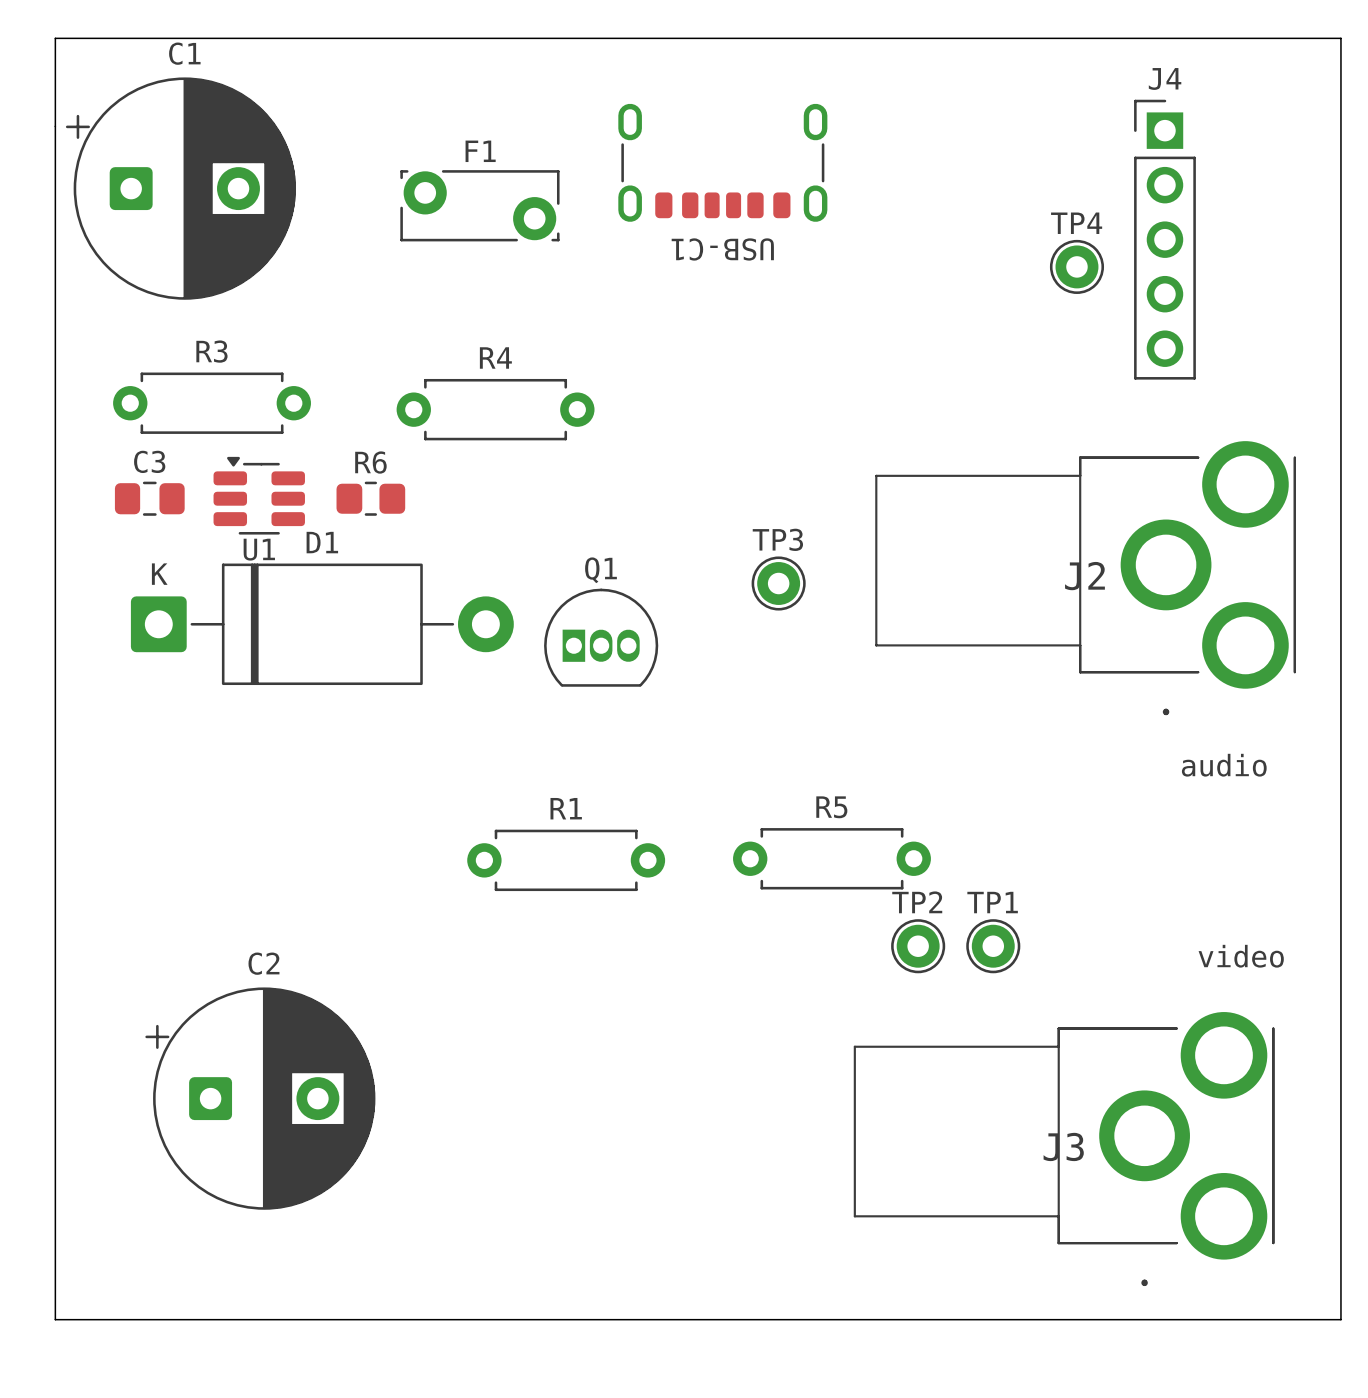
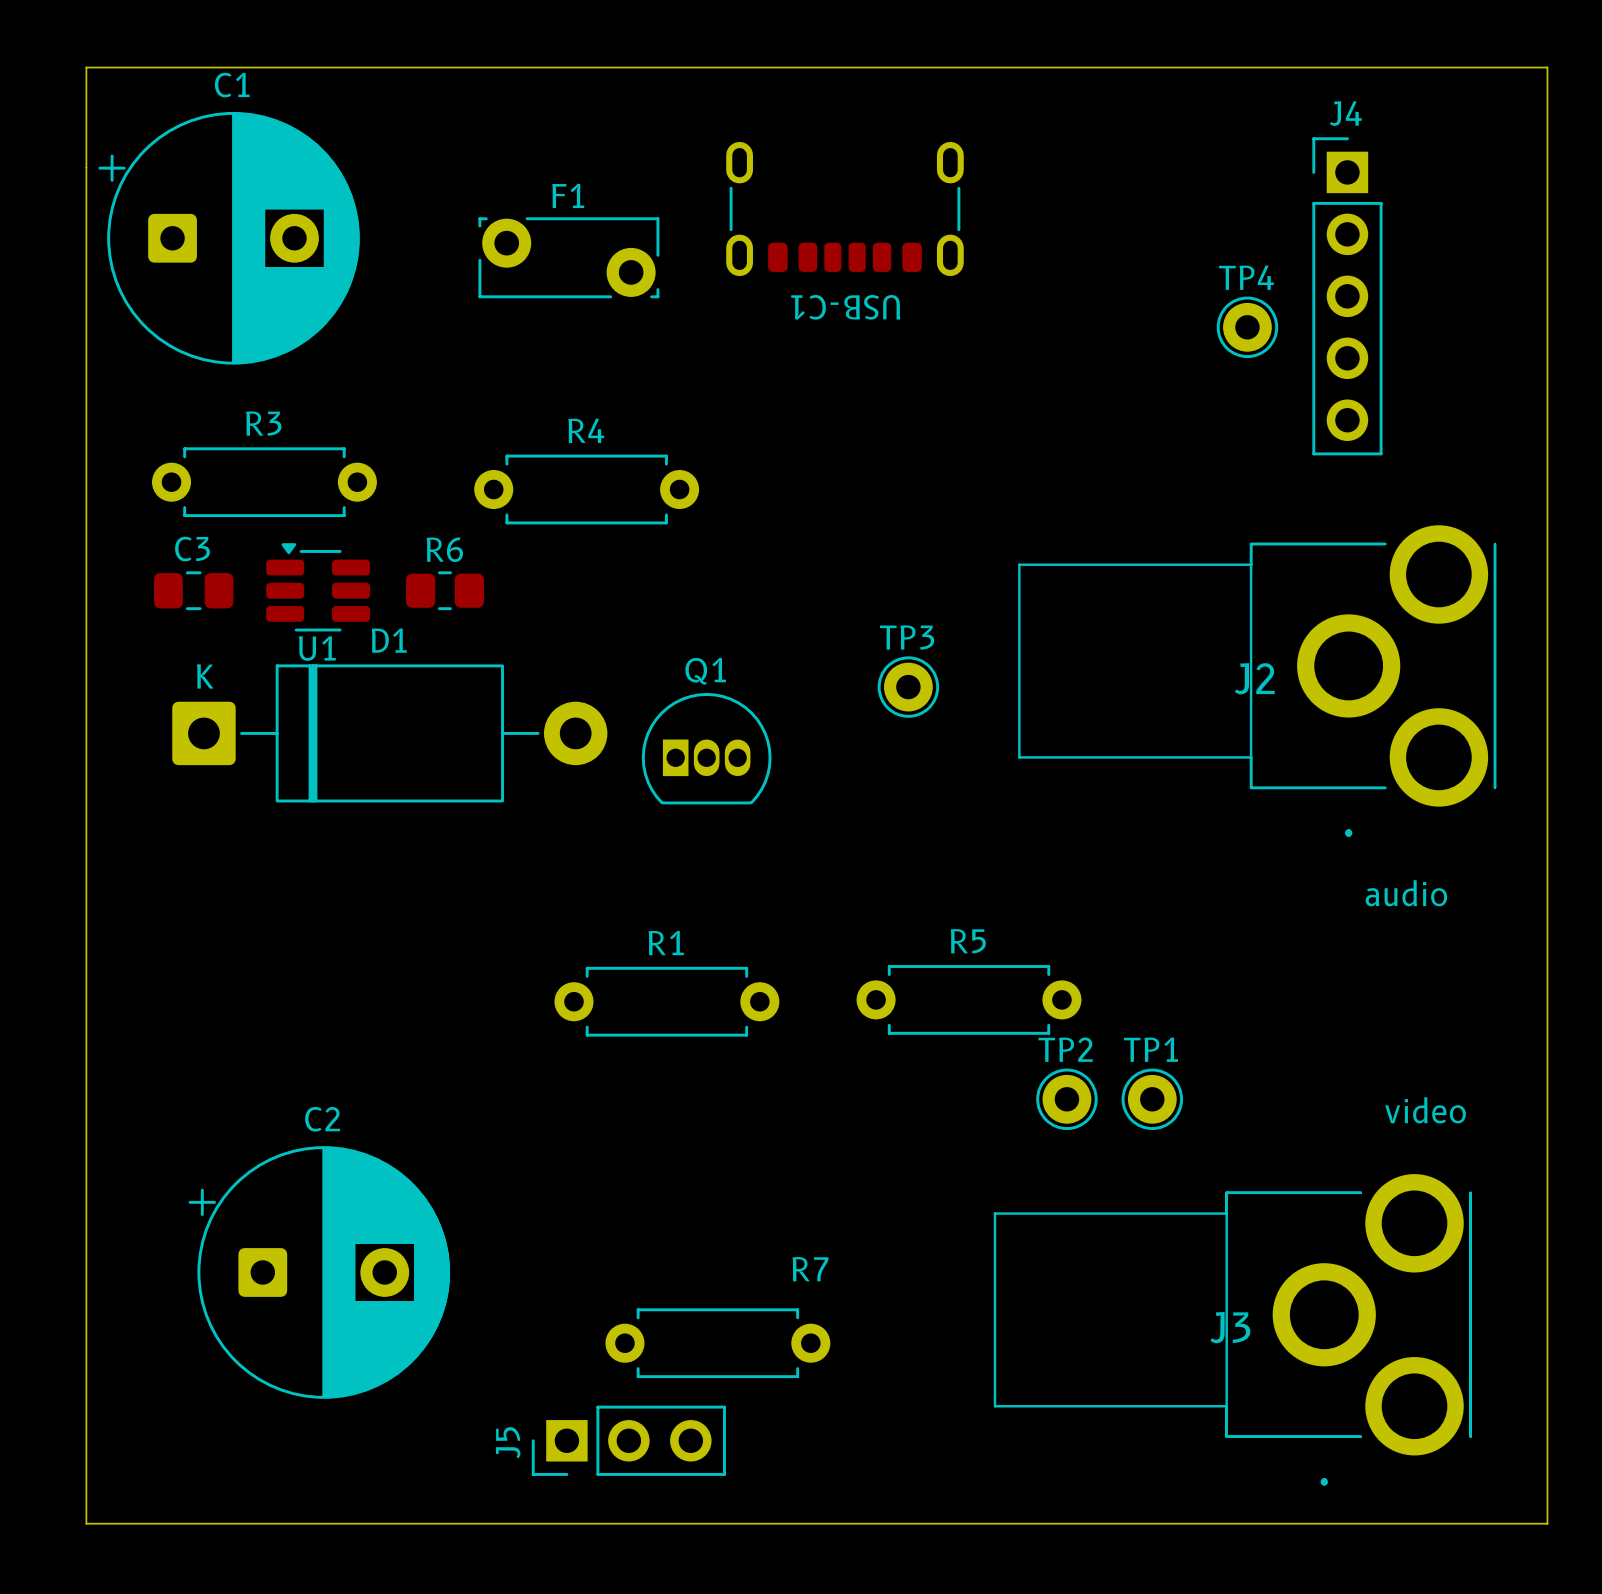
R7: none -> (717, 1343)
J5: none -> (628, 1440)

